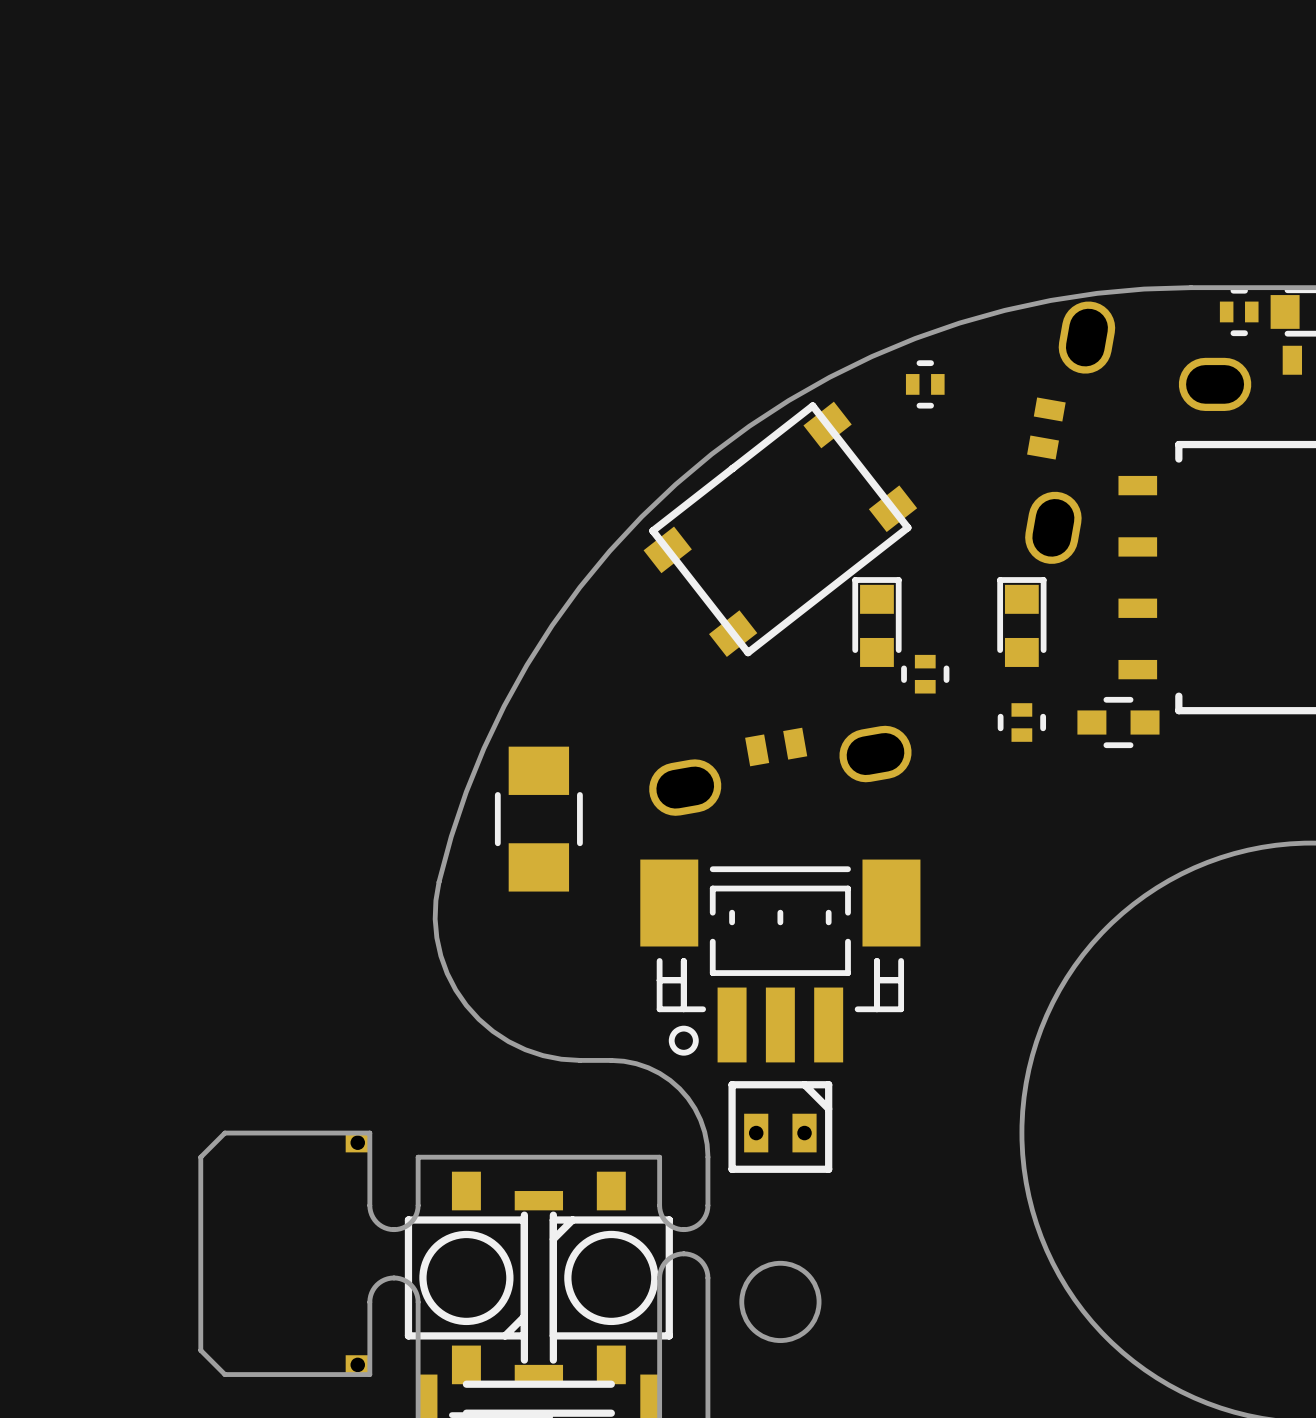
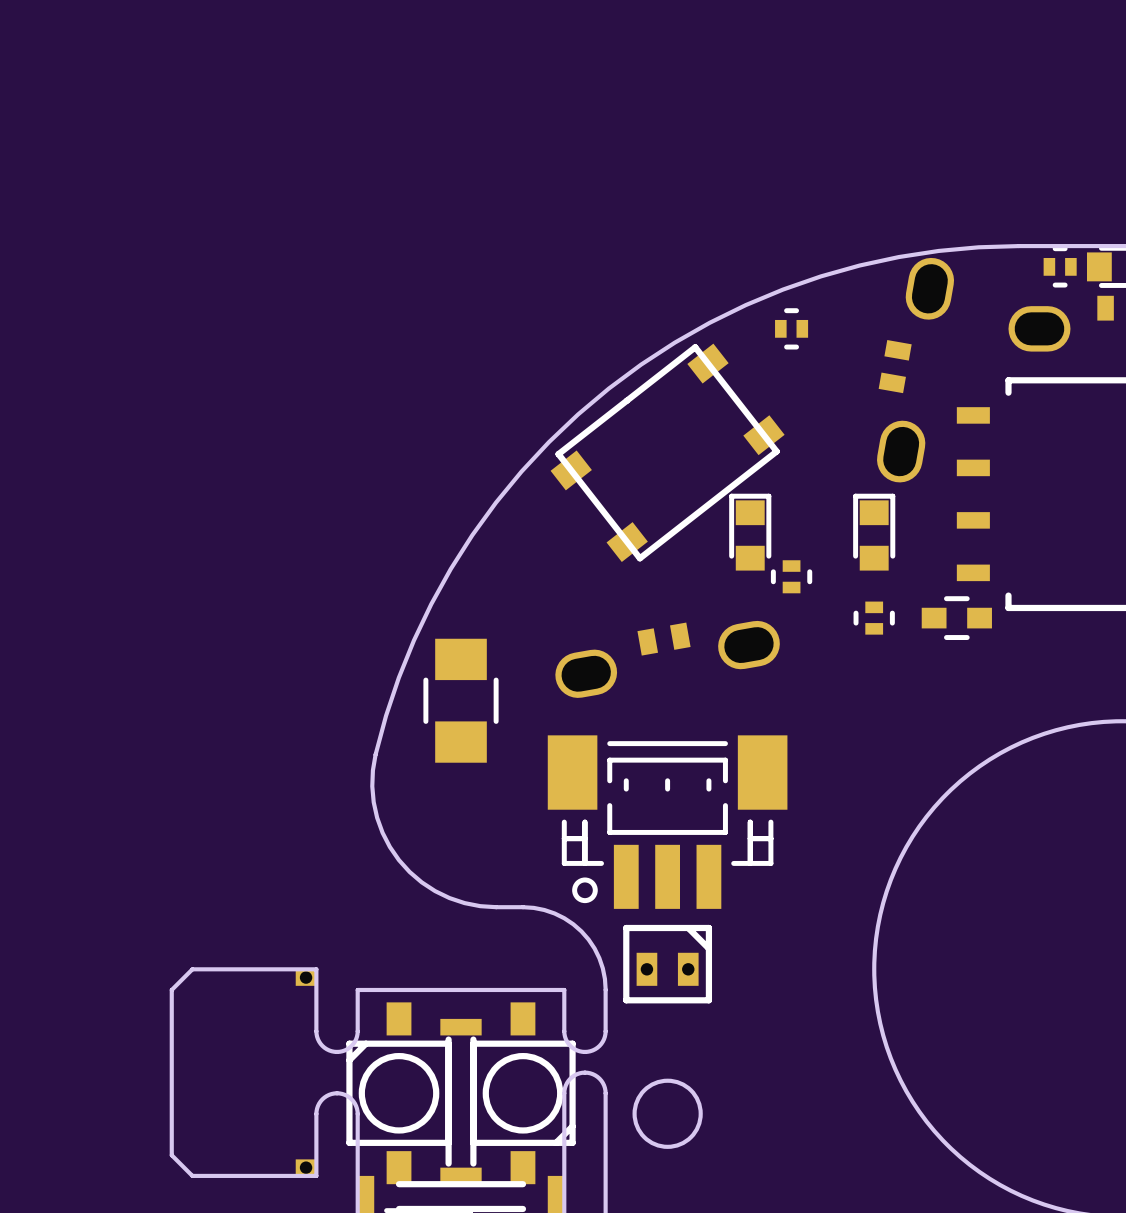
part rotation: 0° (466, 1277) -> 180° (399, 1093)
part rotation: 0° (611, 1277) -> 180° (522, 1093)

